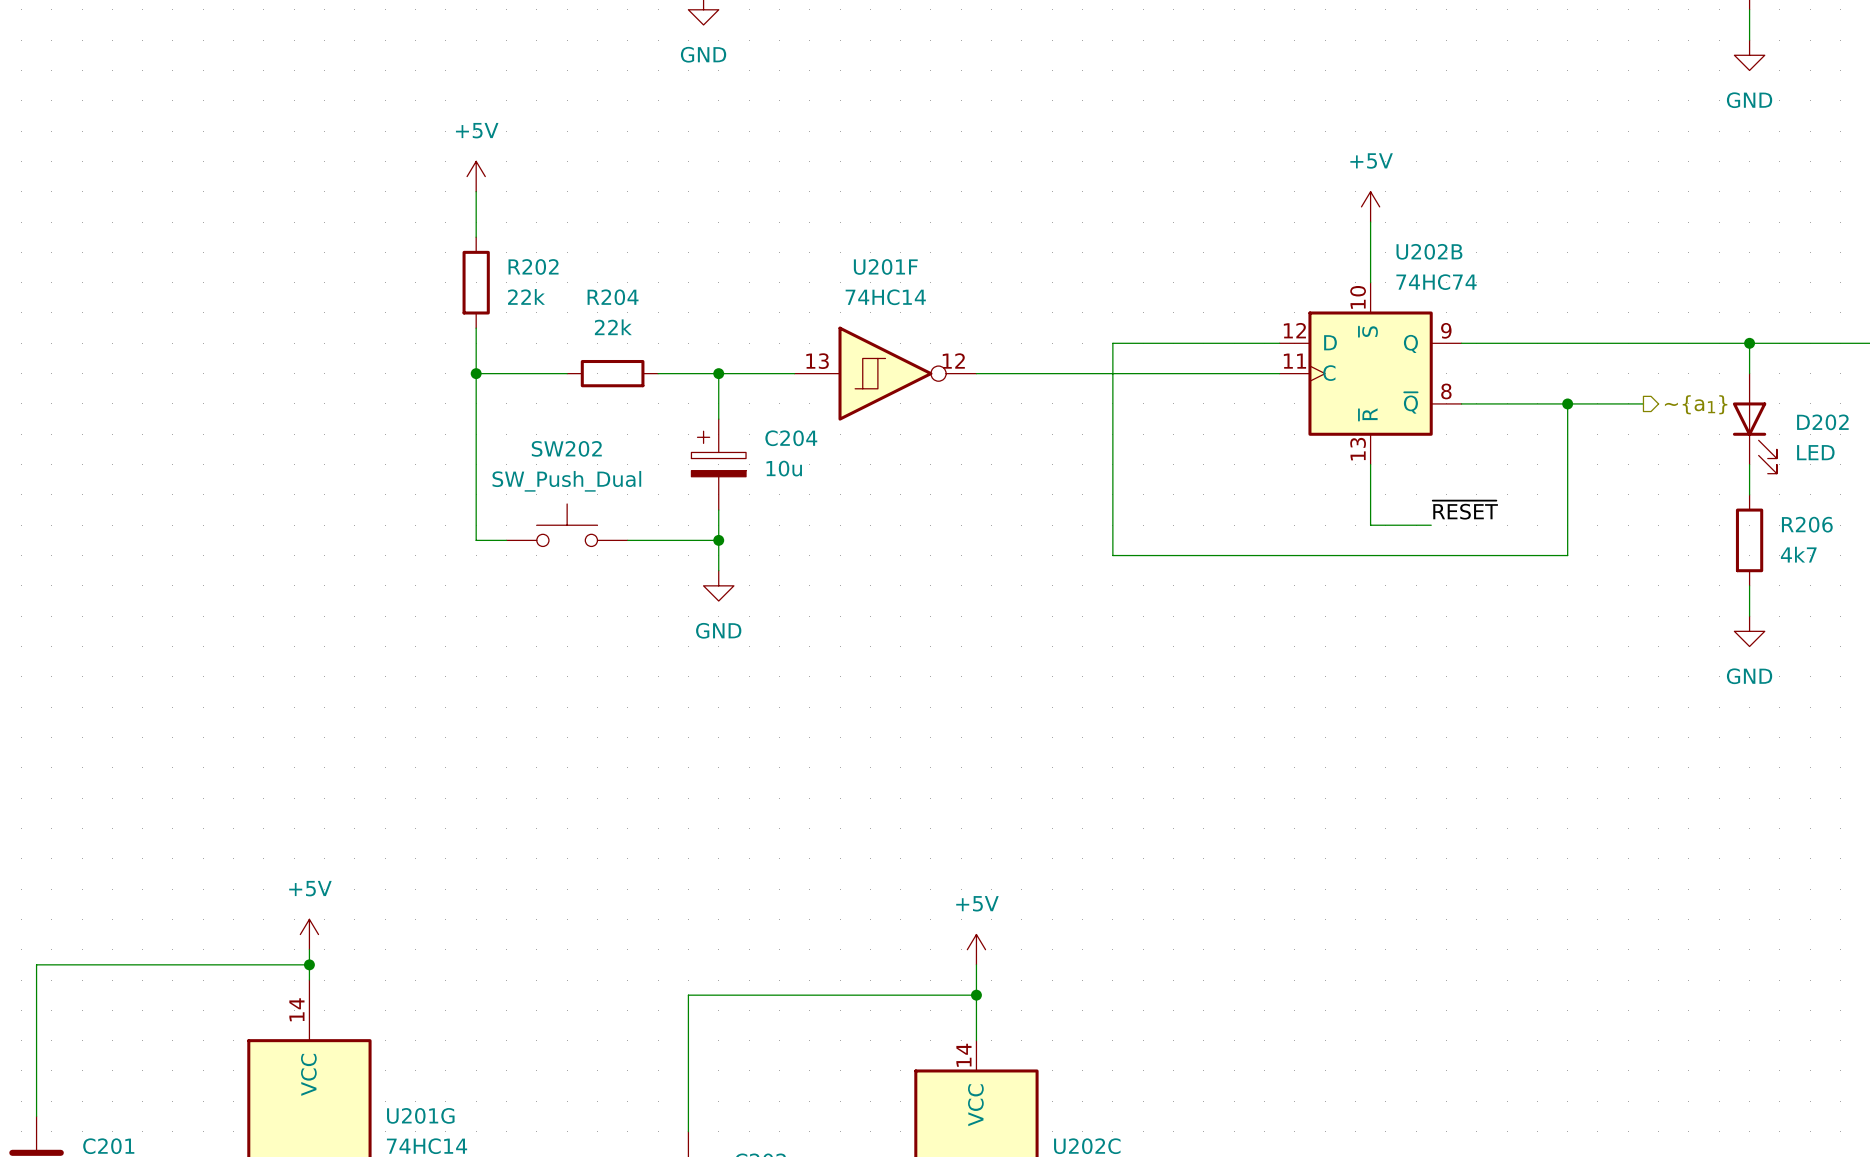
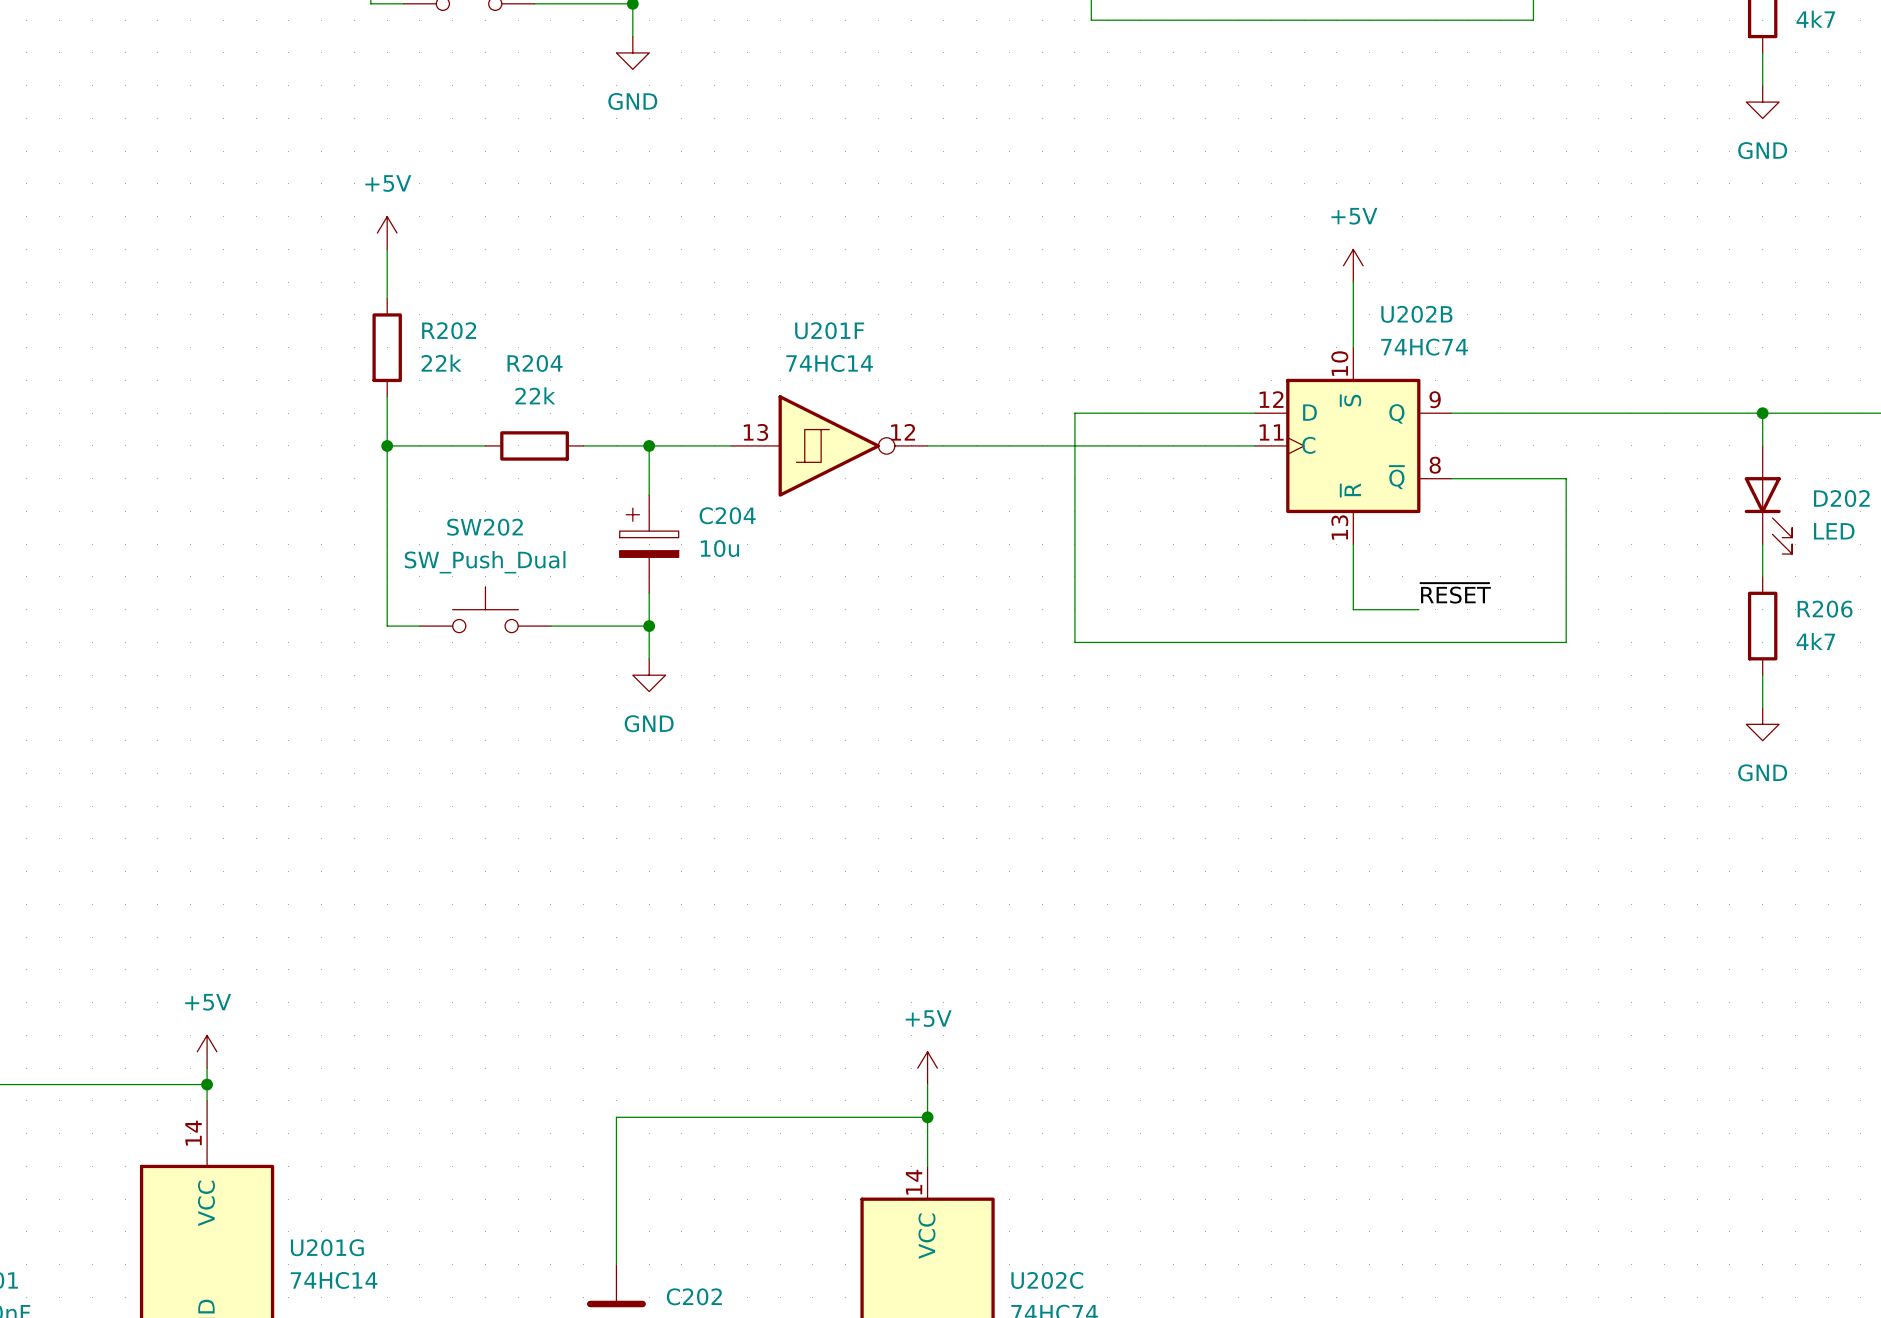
wire: (1567, 403) (1643, 403) -> none
junction: (1567, 403) -> none
hierarchical label: ~{a1} (1696, 404) -> none

